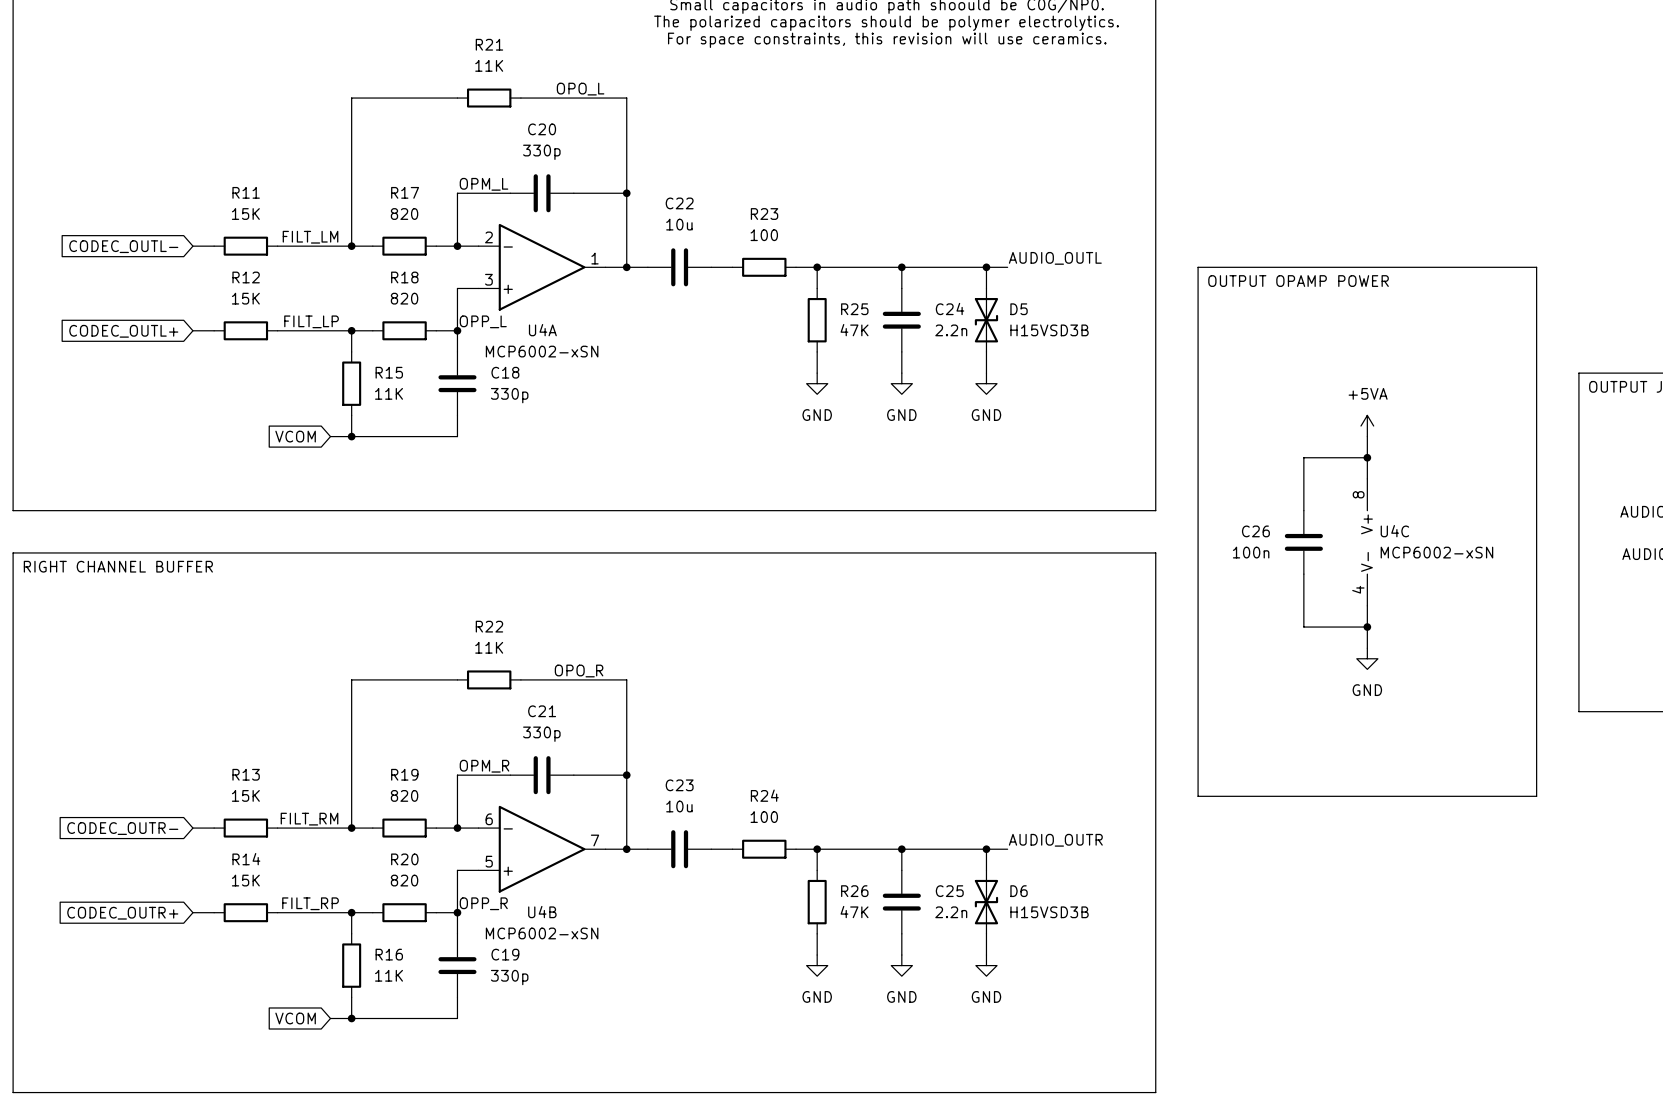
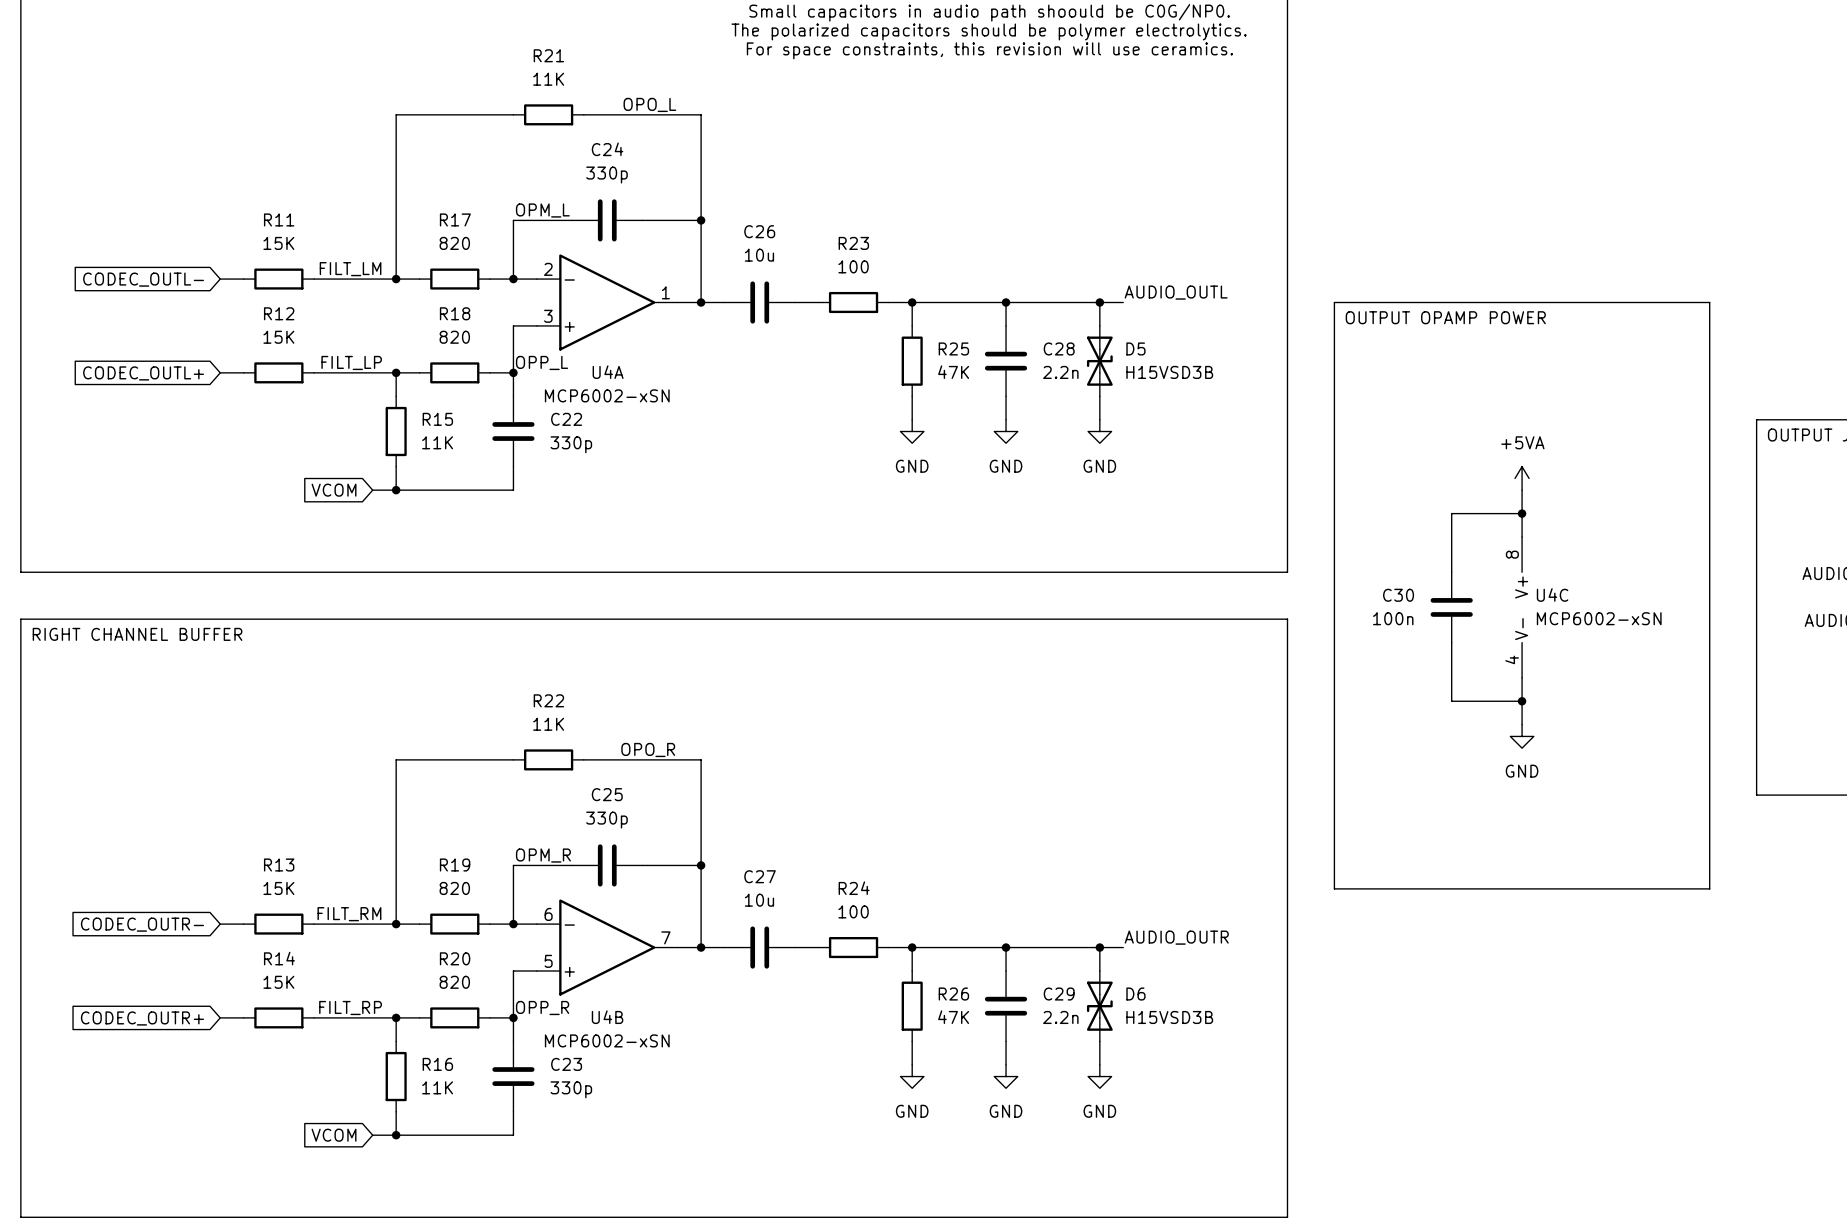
C20 name: C20 (542, 129) -> C24 (607, 149)
C22 name: C22 (679, 203) -> C26 (759, 231)
C24 name: C24 (950, 308) -> C28 (1059, 348)
C18 name: C18 (505, 372) -> C22 (566, 419)
C26 name: C26 (1255, 531) -> C30 (1398, 595)
C21 name: C21 (542, 711) -> C25 (607, 794)
C23 name: C23 (679, 785) -> C27 (760, 876)
C25 name: C25 (949, 891) -> C29 (1059, 994)
C19 name: C19 (505, 954) -> C23 (566, 1064)

